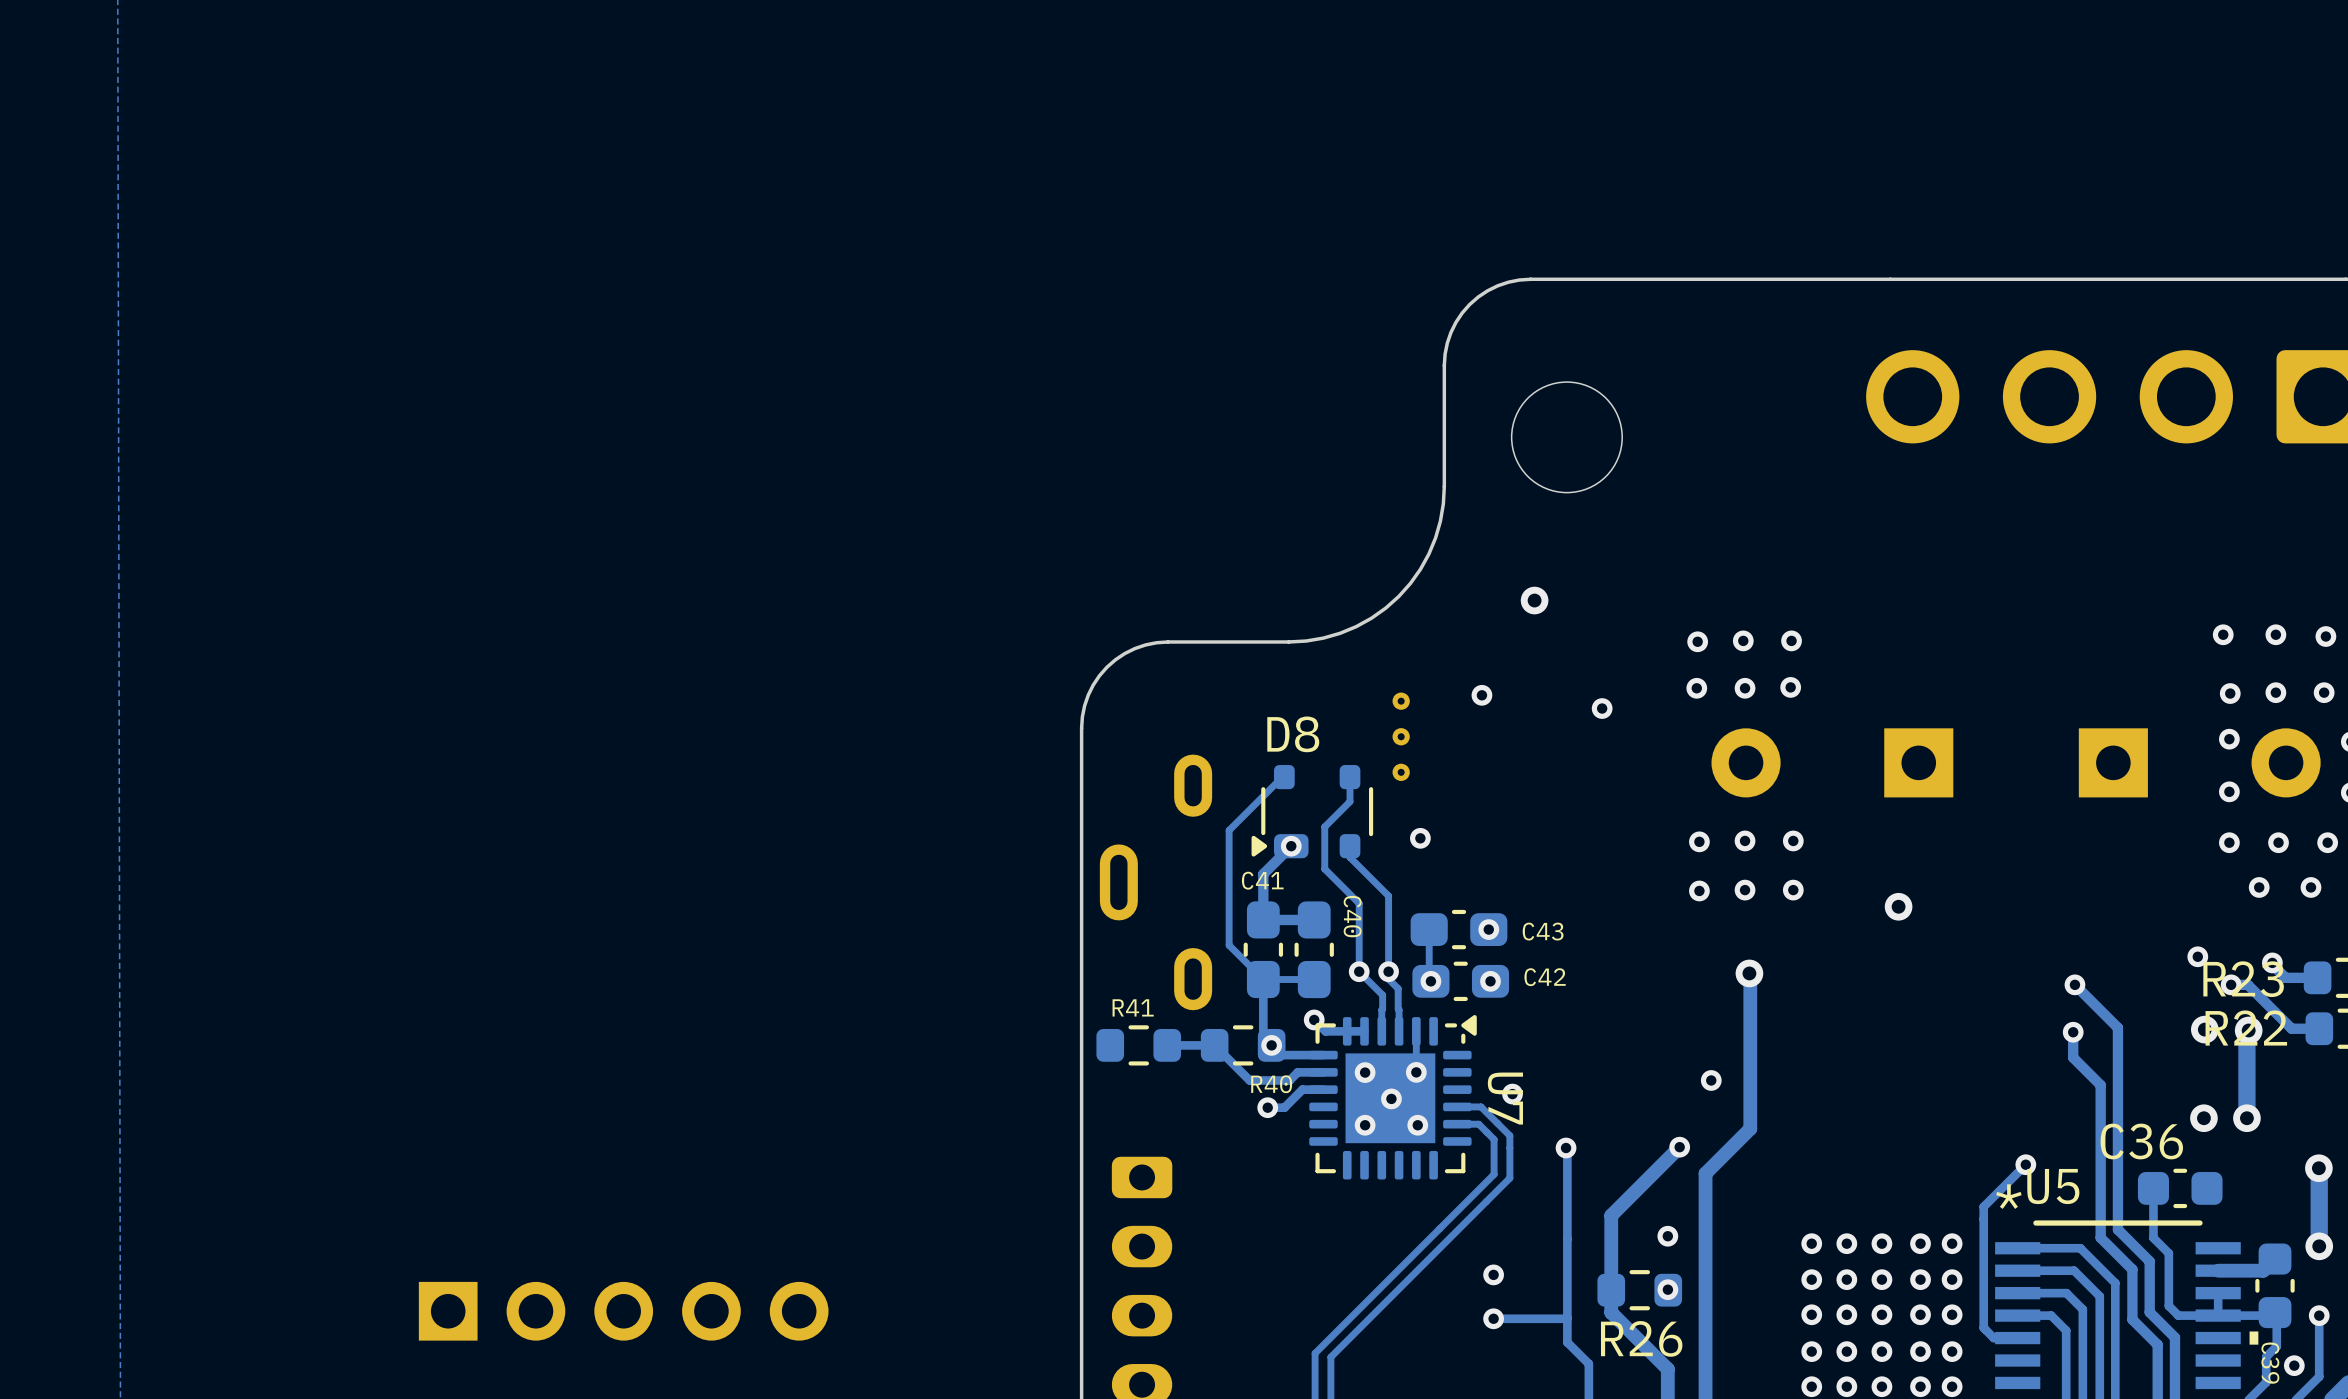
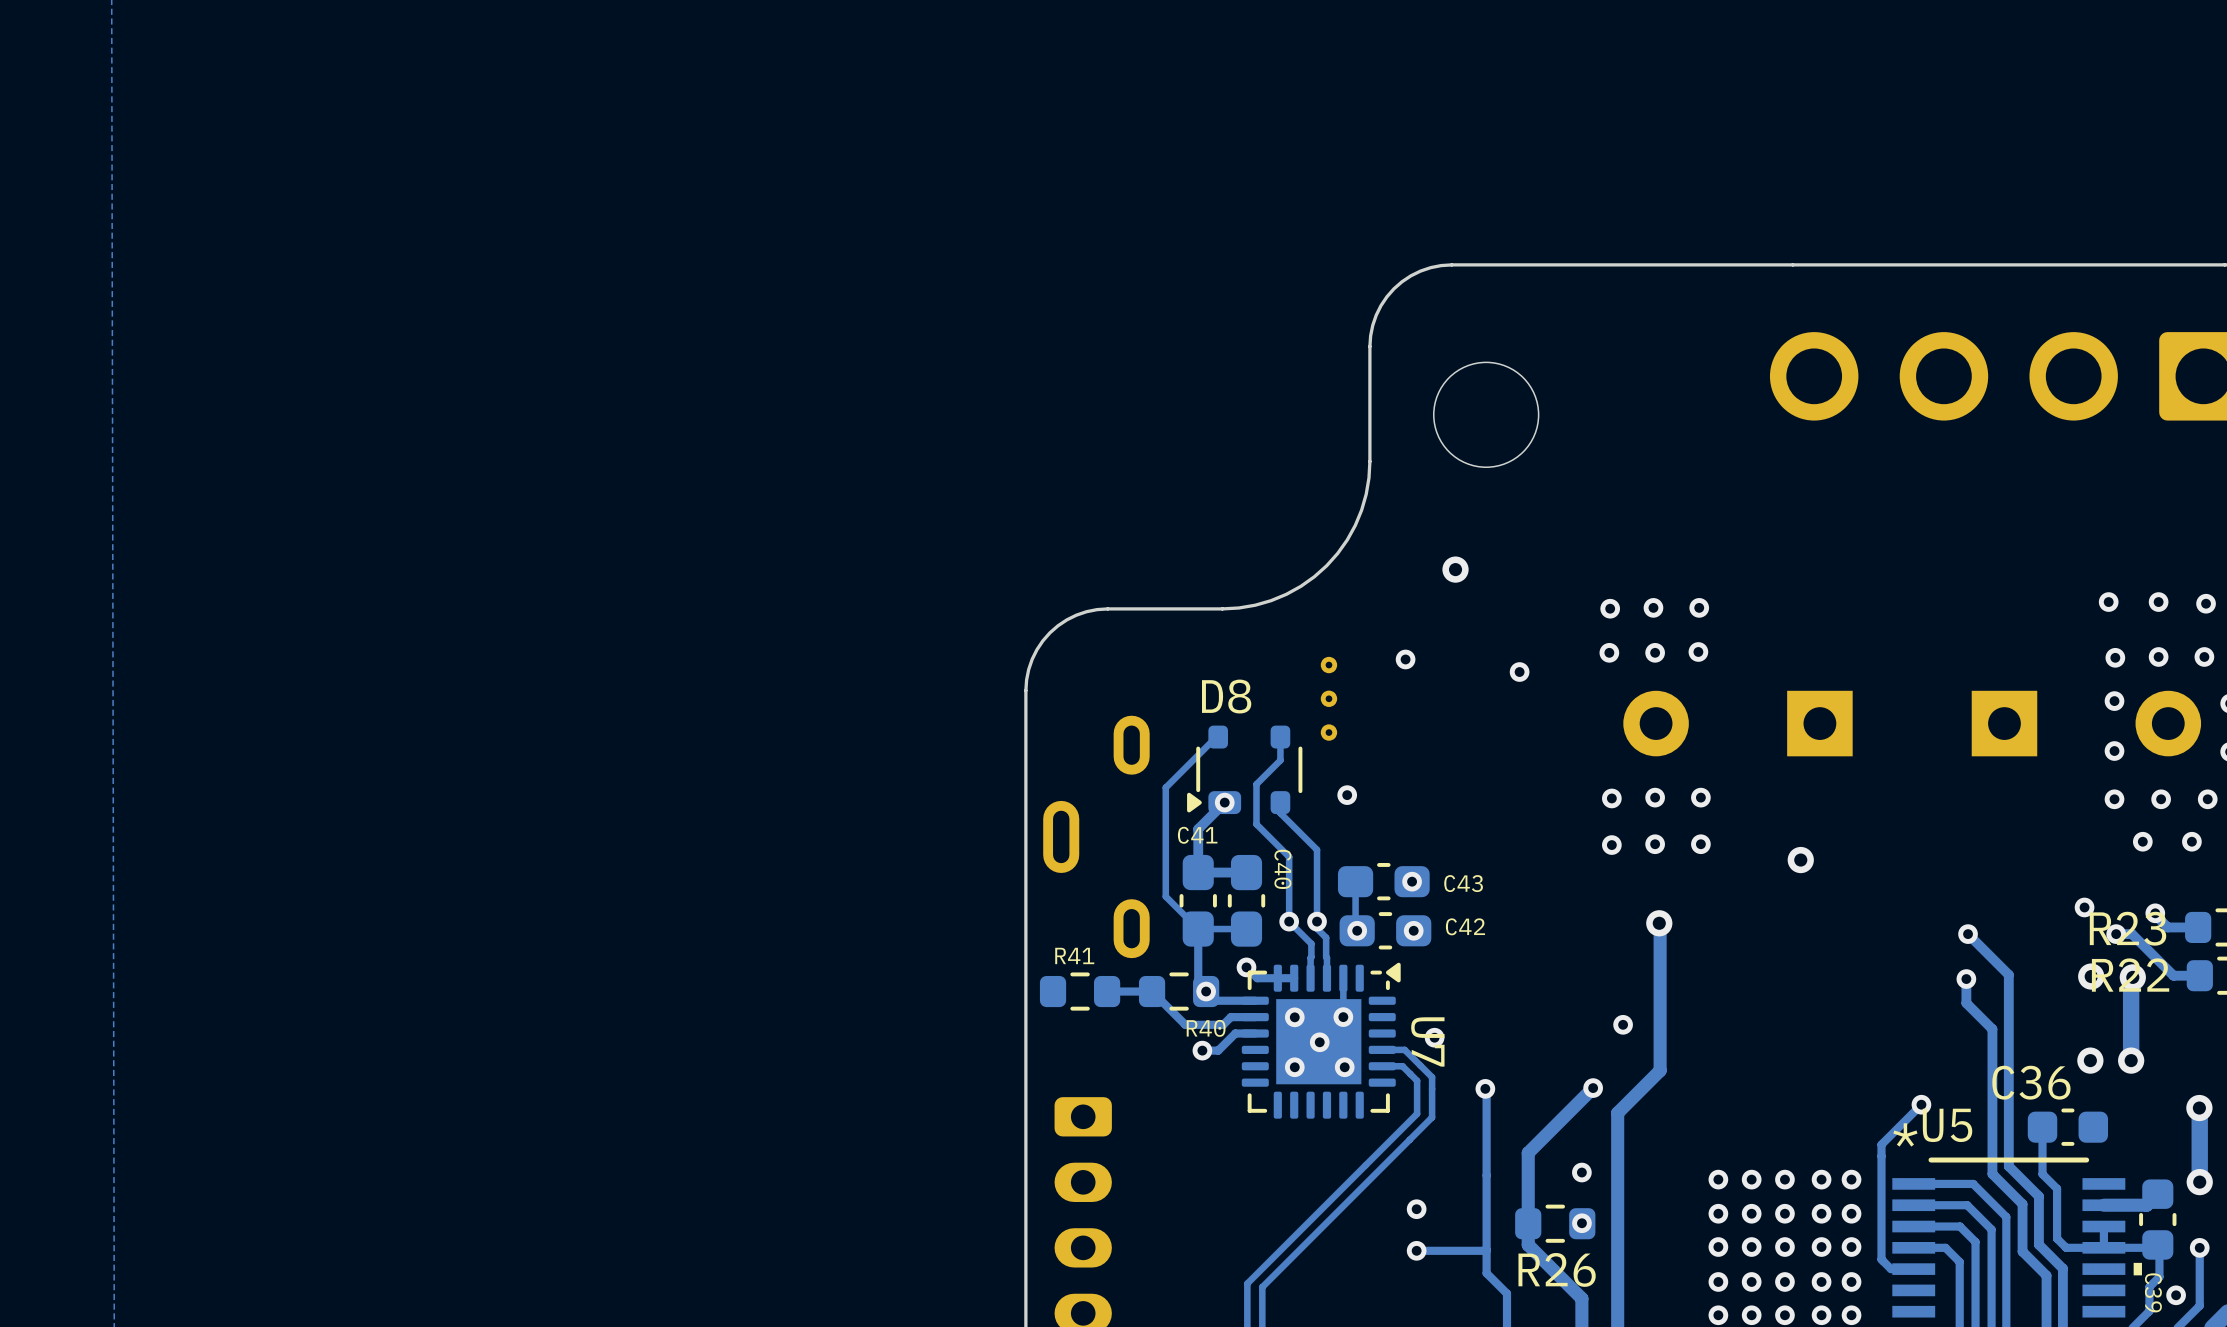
part: (623, 1311) -> none

